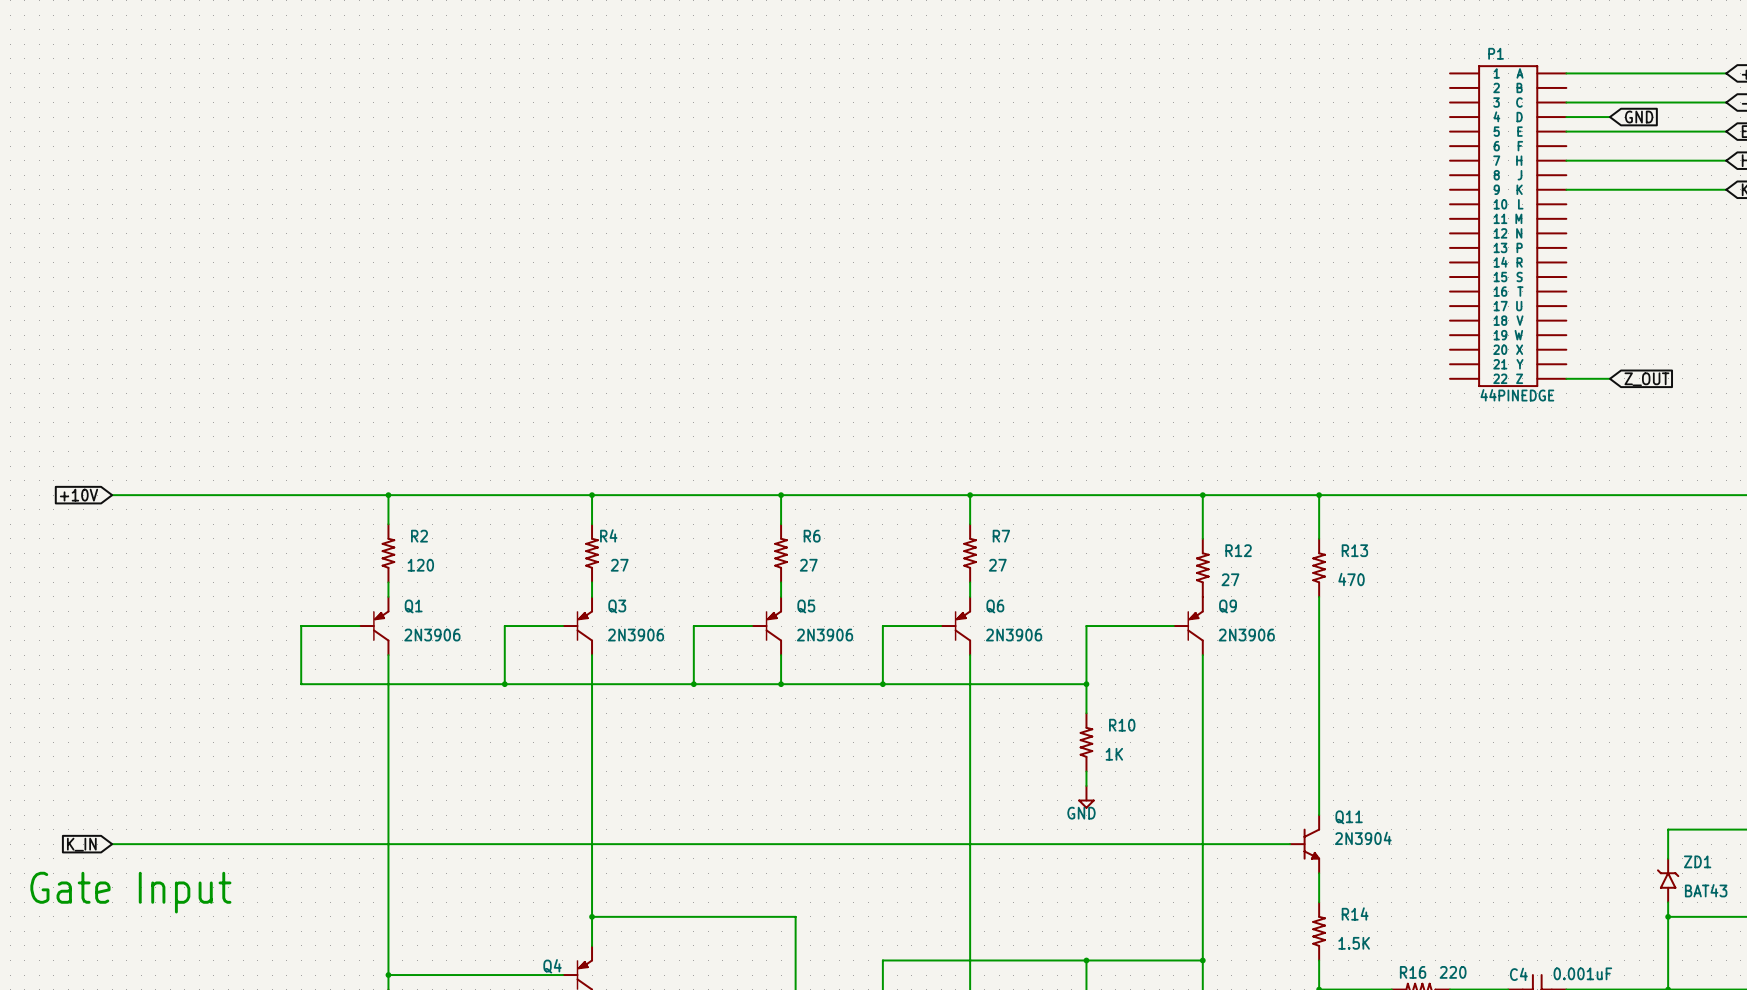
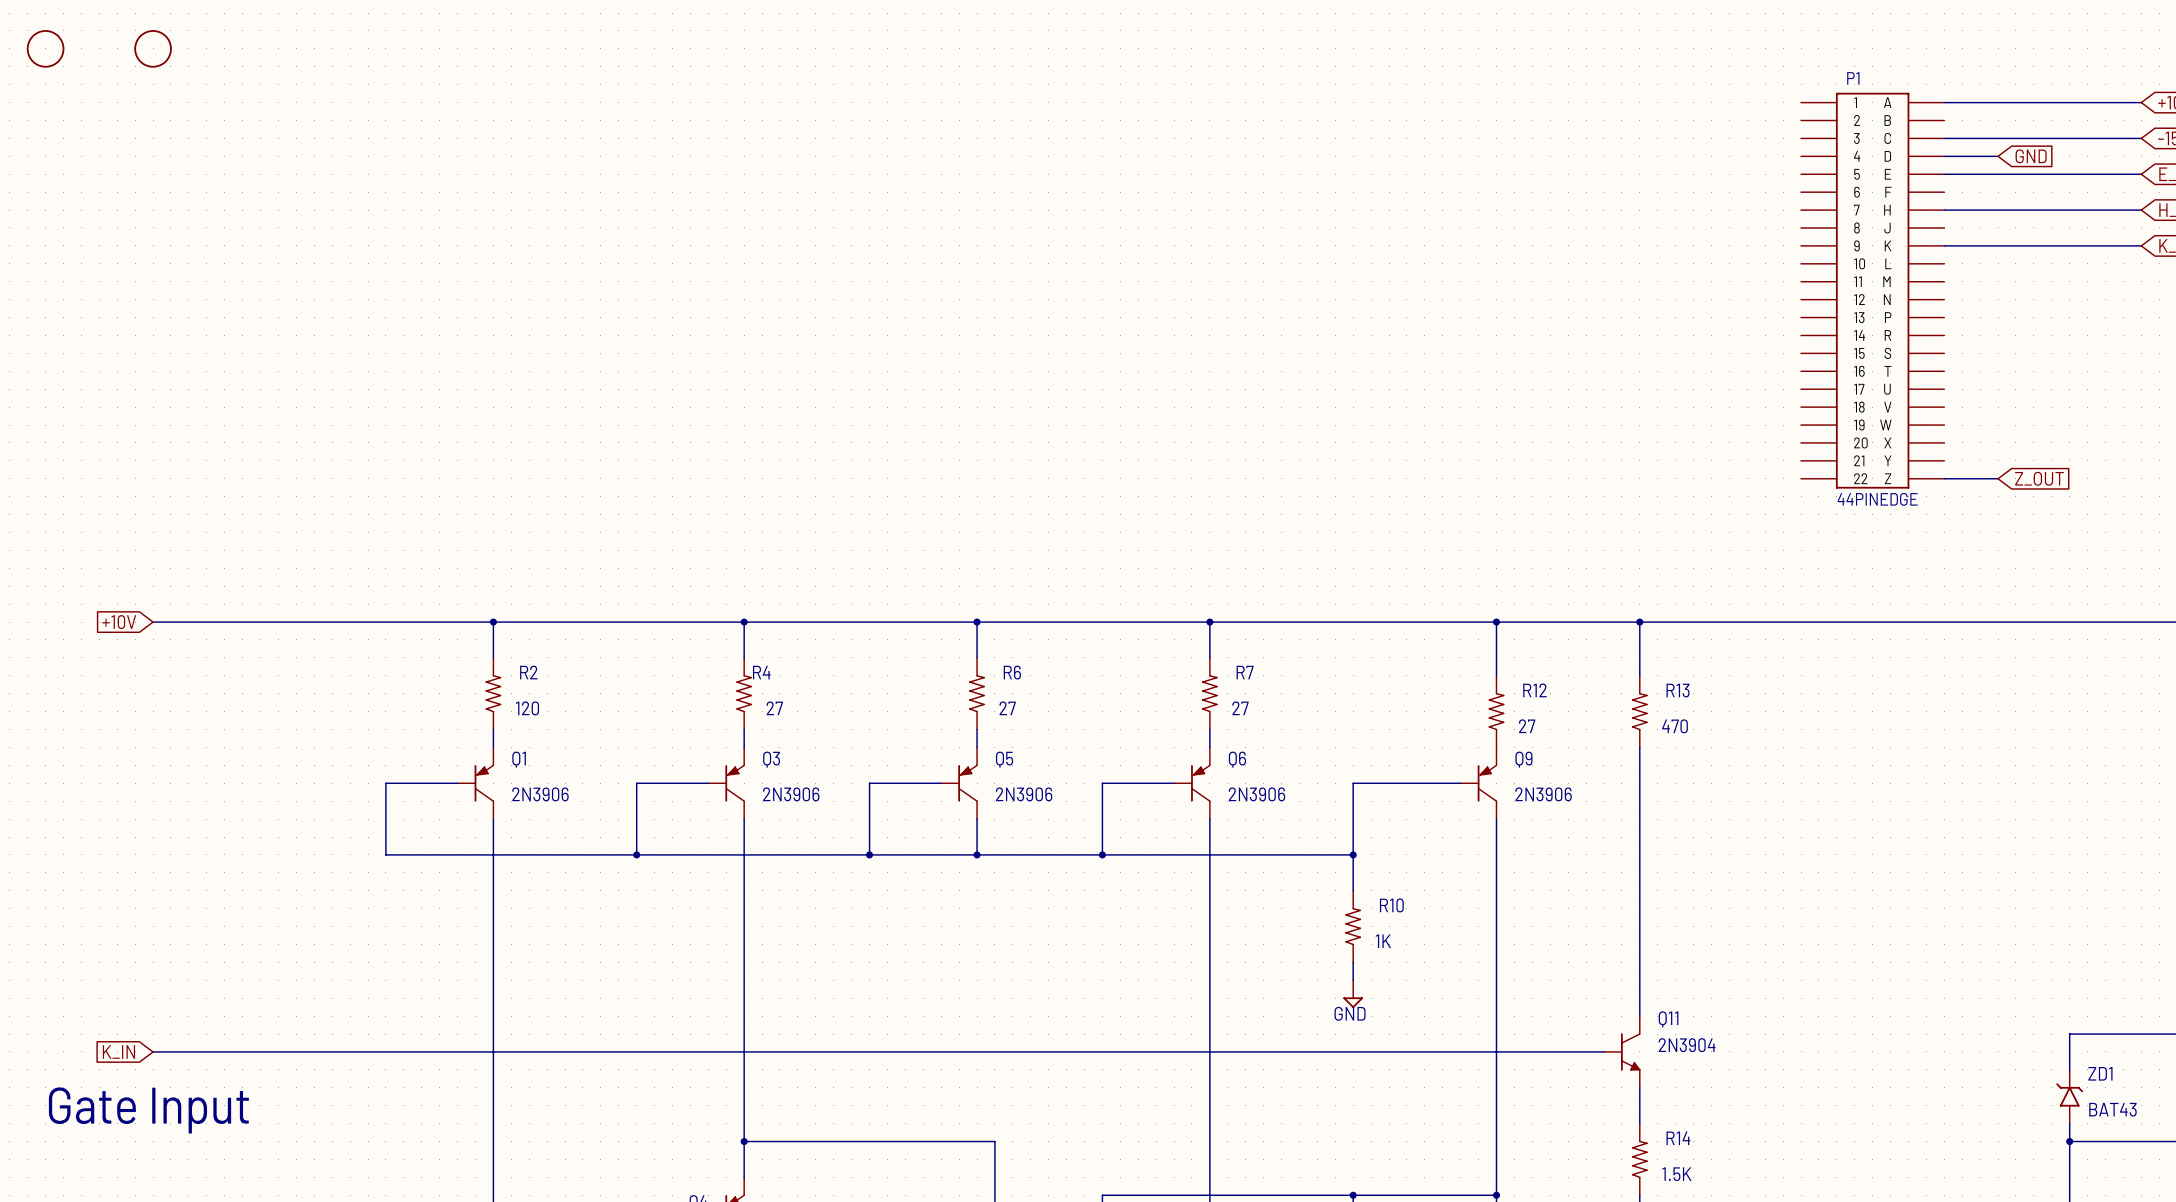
part: none -> (45, 48)
part: none -> (153, 48)

